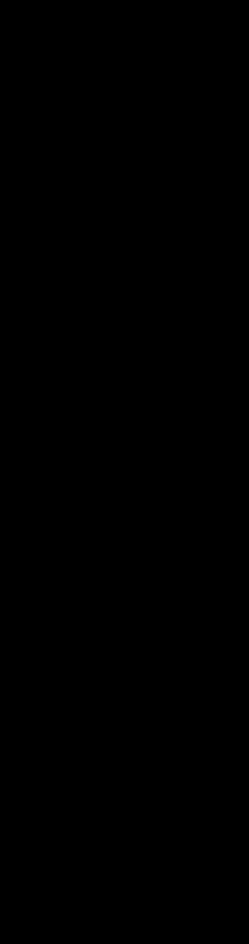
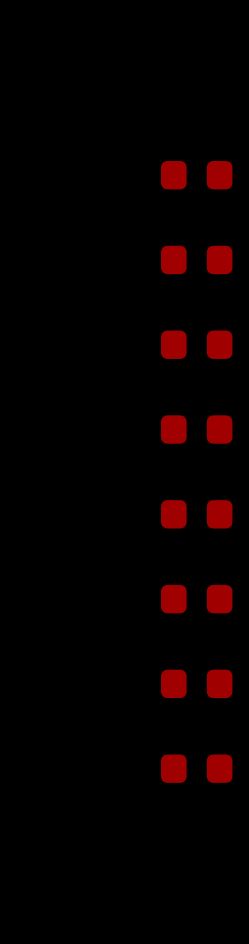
part: none -> (196, 175)
part: none -> (196, 259)
part: none -> (196, 344)
part: none -> (196, 429)
part: none -> (196, 514)
part: none -> (196, 599)
part: none -> (196, 683)
part: none -> (196, 768)

